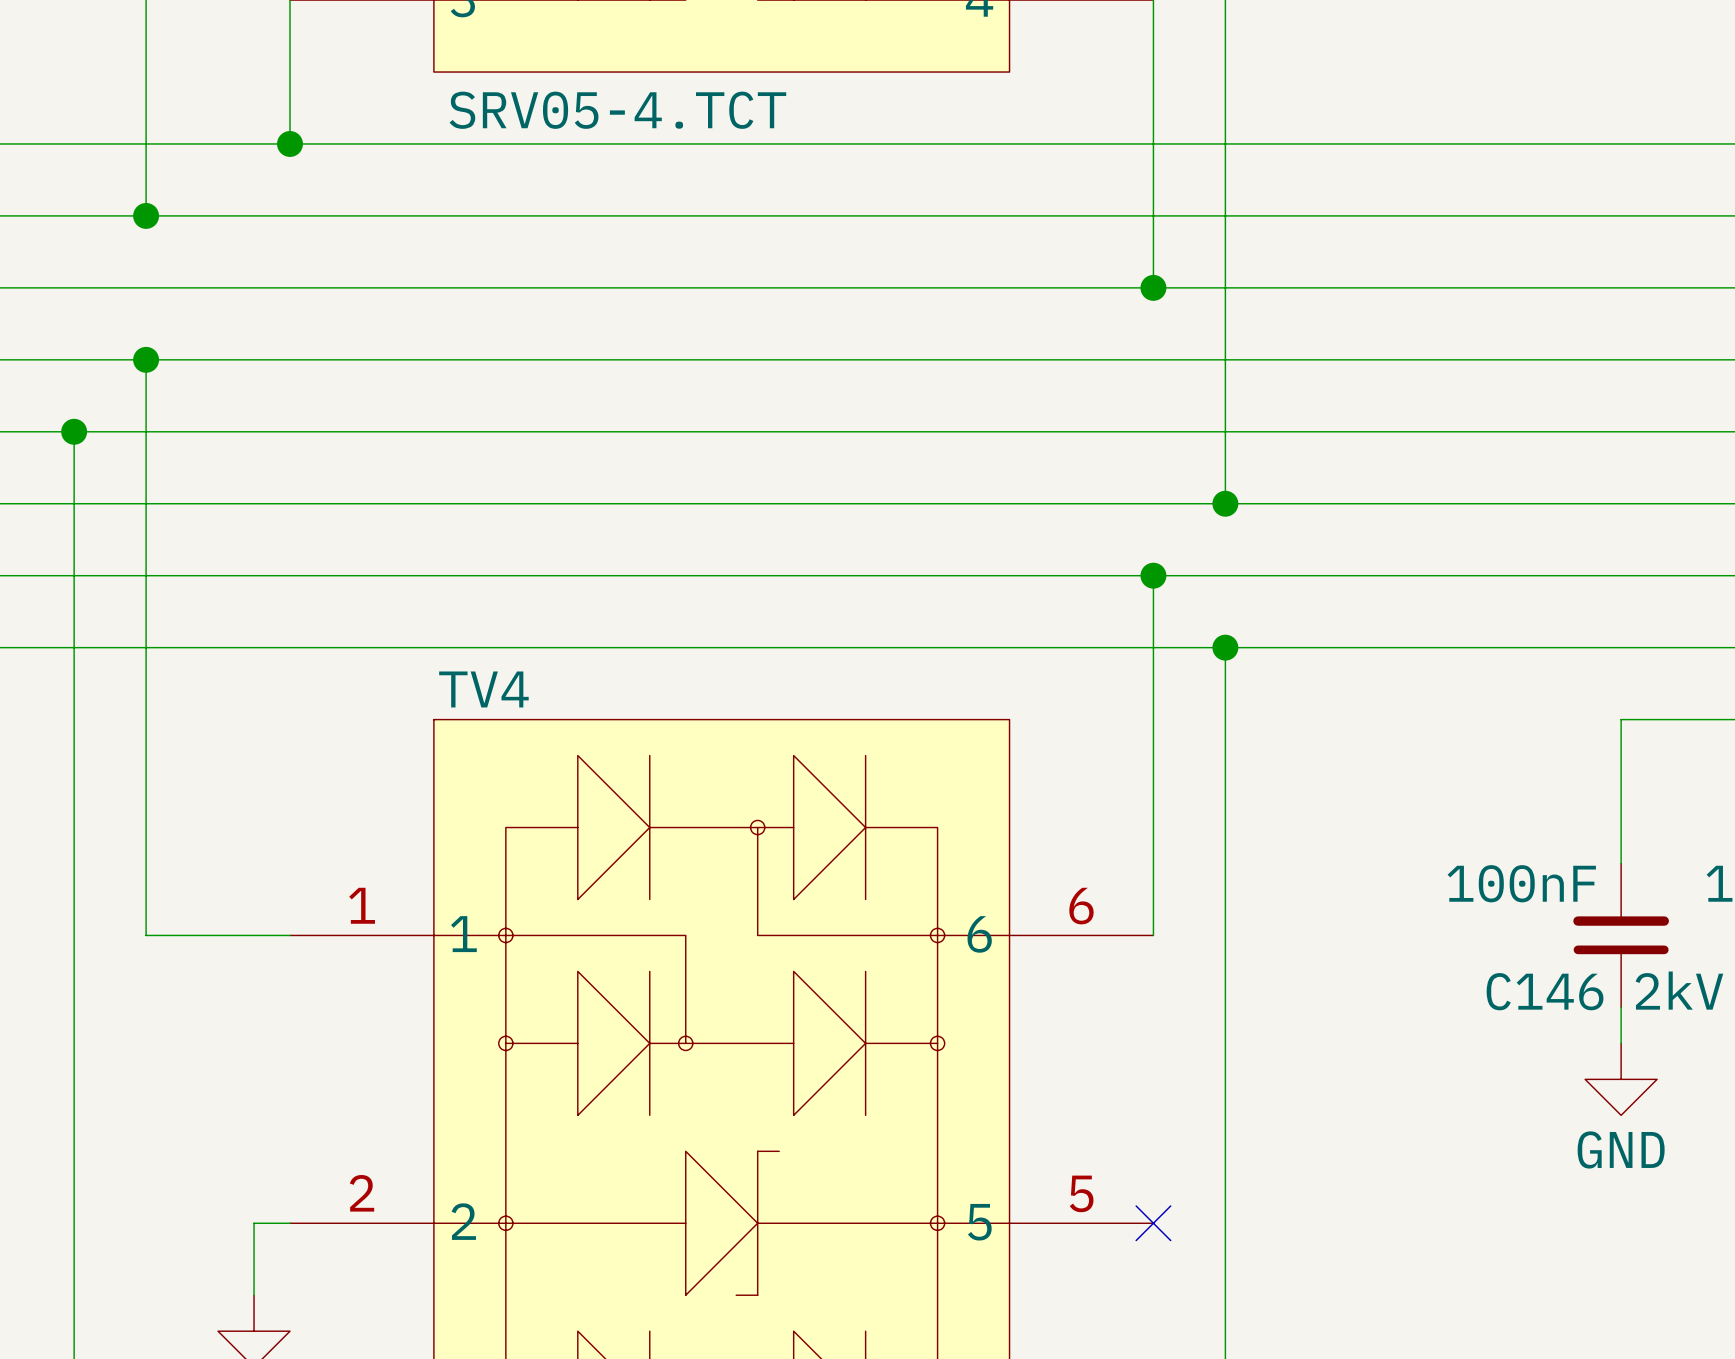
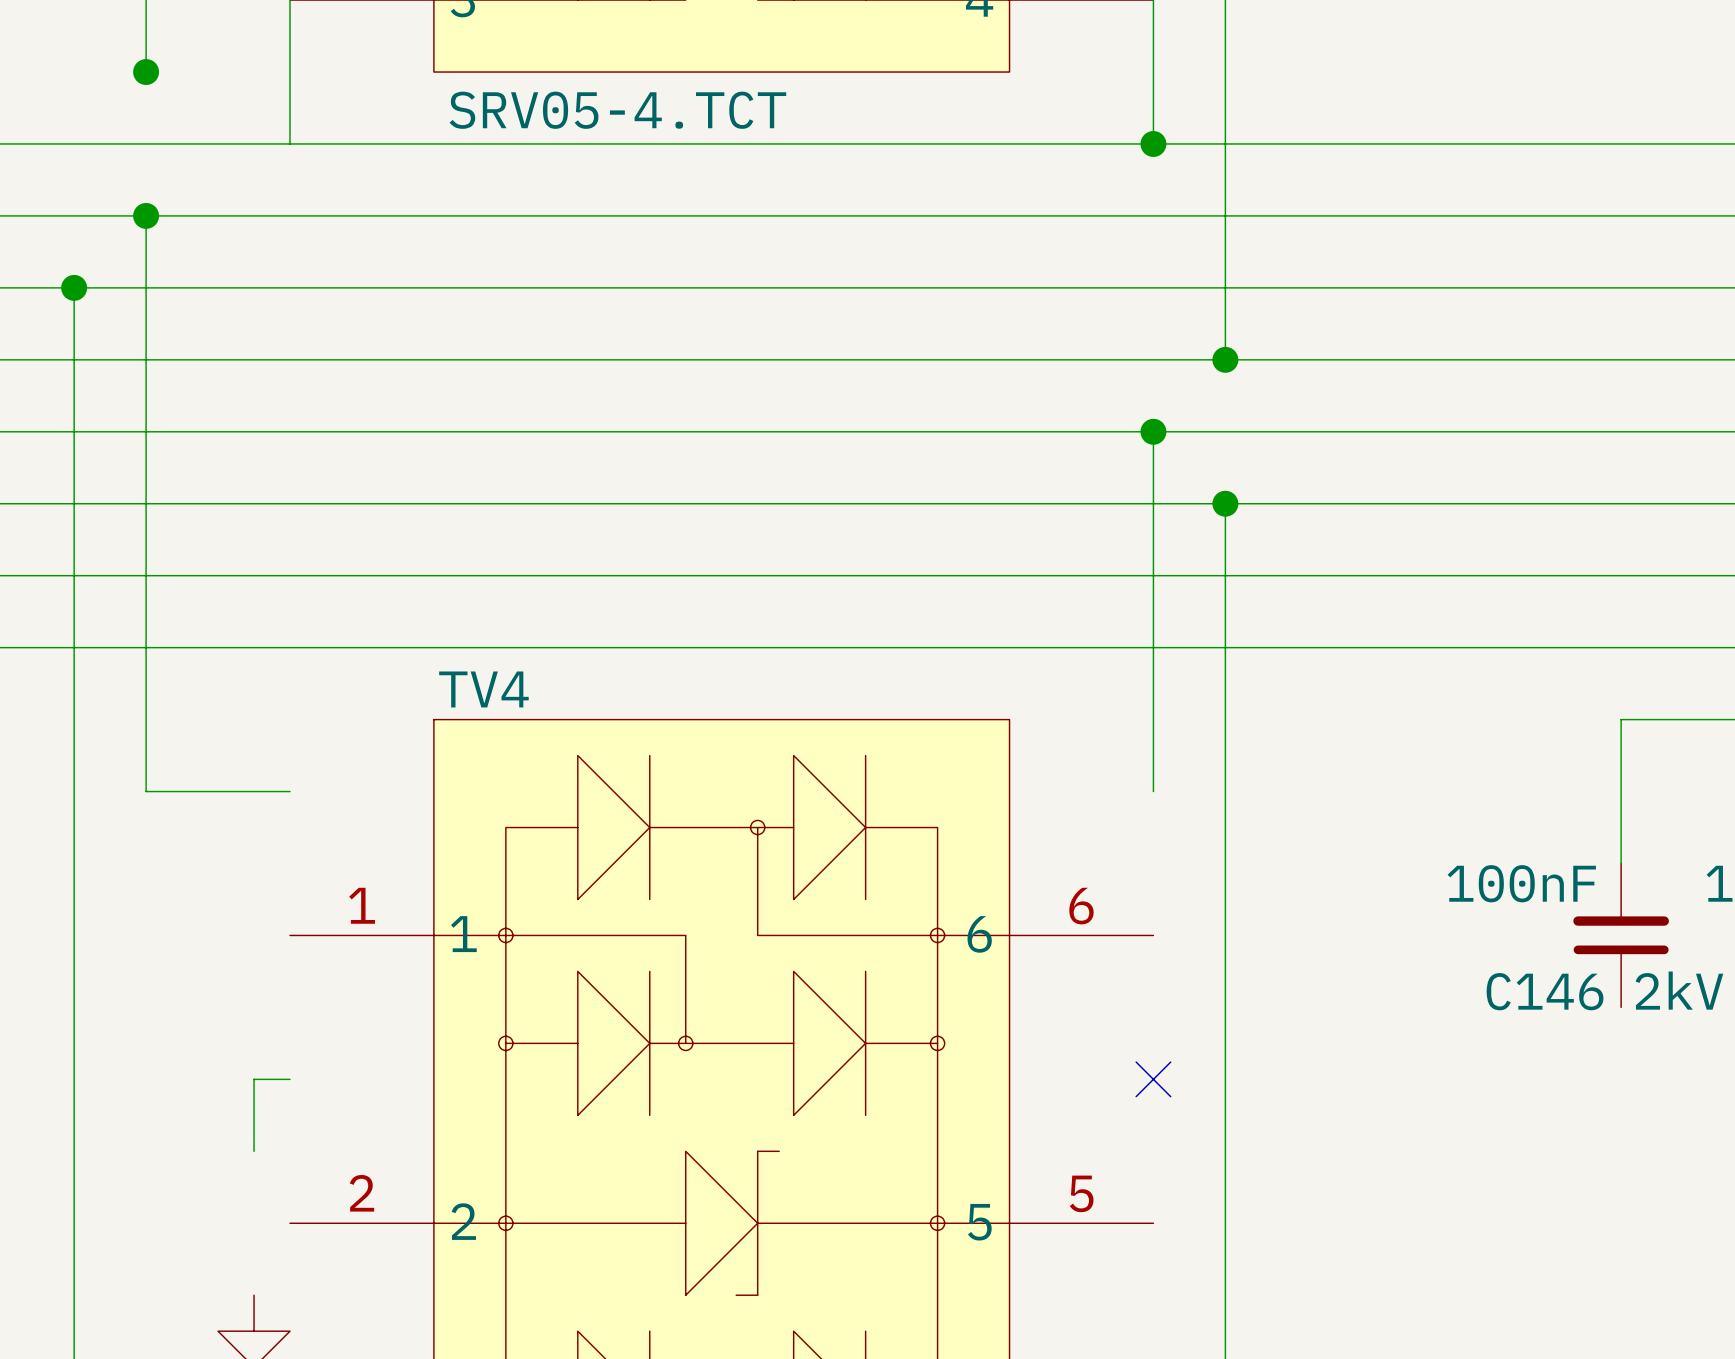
wire: (146, 72) (146, 215) -> (146, 359) (146, 215)
junction: none -> (146, 72)
junction: (289, 143) -> none
wire: (1153, 143) (1153, 287) -> (1153, 431) (1153, 575)
junction: none -> (1153, 143)
wire: none -> (74, 287) (74, 431)
junction: none -> (74, 287)
junction: (1153, 287) -> none
junction: (146, 359) -> none
wire: (1225, 359) (1225, 503) -> (1225, 647) (1225, 503)
junction: none -> (1225, 359)
junction: (74, 431) -> none
junction: none -> (1153, 431)
junction: (1153, 575) -> none
junction: (1225, 647) -> none
wire: (146, 791) (146, 935) (289, 935) -> (146, 791) (289, 791)
wire: (1153, 791) (1153, 935) -> none
wire: (1621, 1007) (1621, 1043) -> none
power symbol: GND (1621, 1079) -> none
wire: (289, 1223) (254, 1223) (254, 1295) -> (289, 1079) (254, 1079) (254, 1151)
no-connect mark position: (1153, 1223) -> (1153, 1079)

